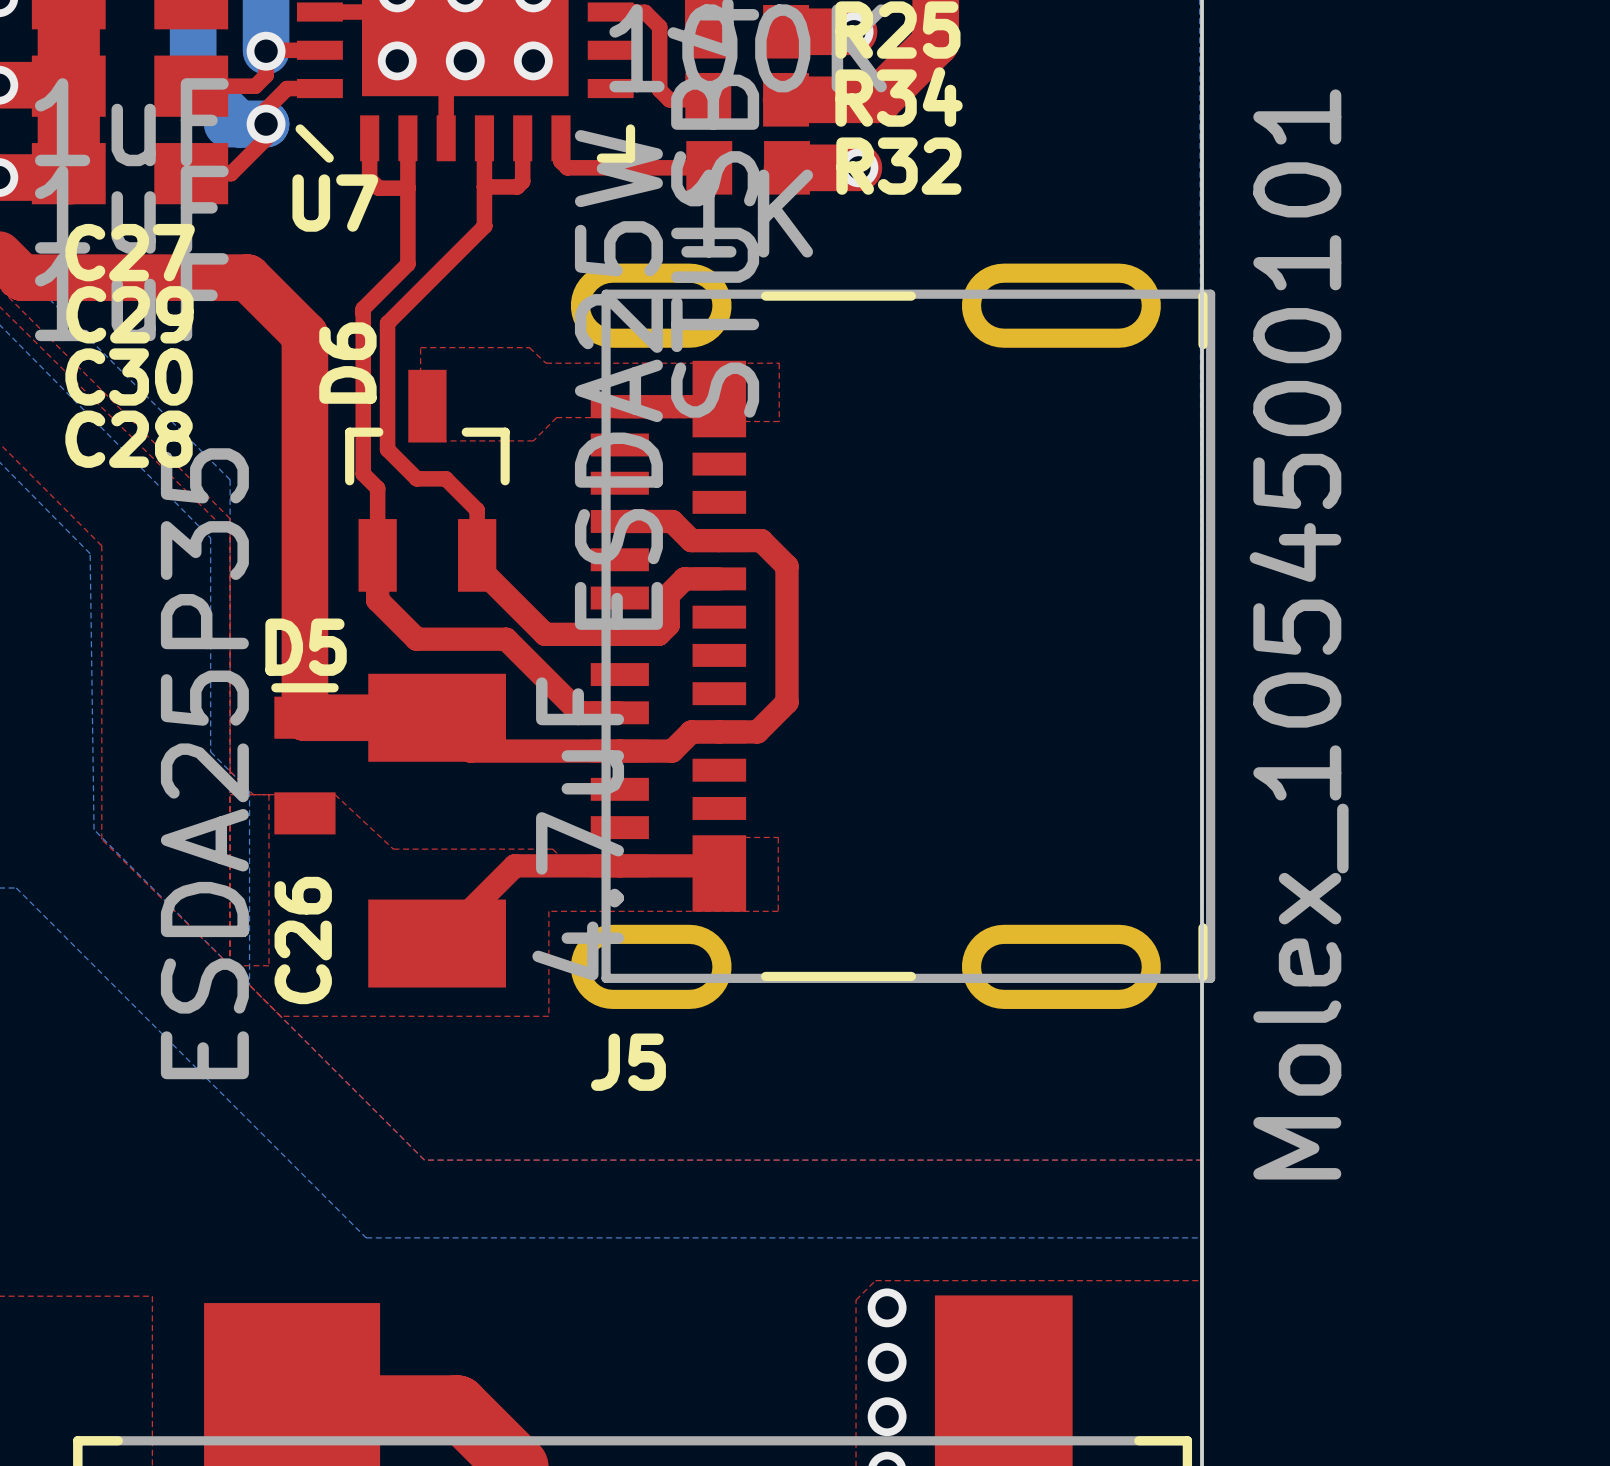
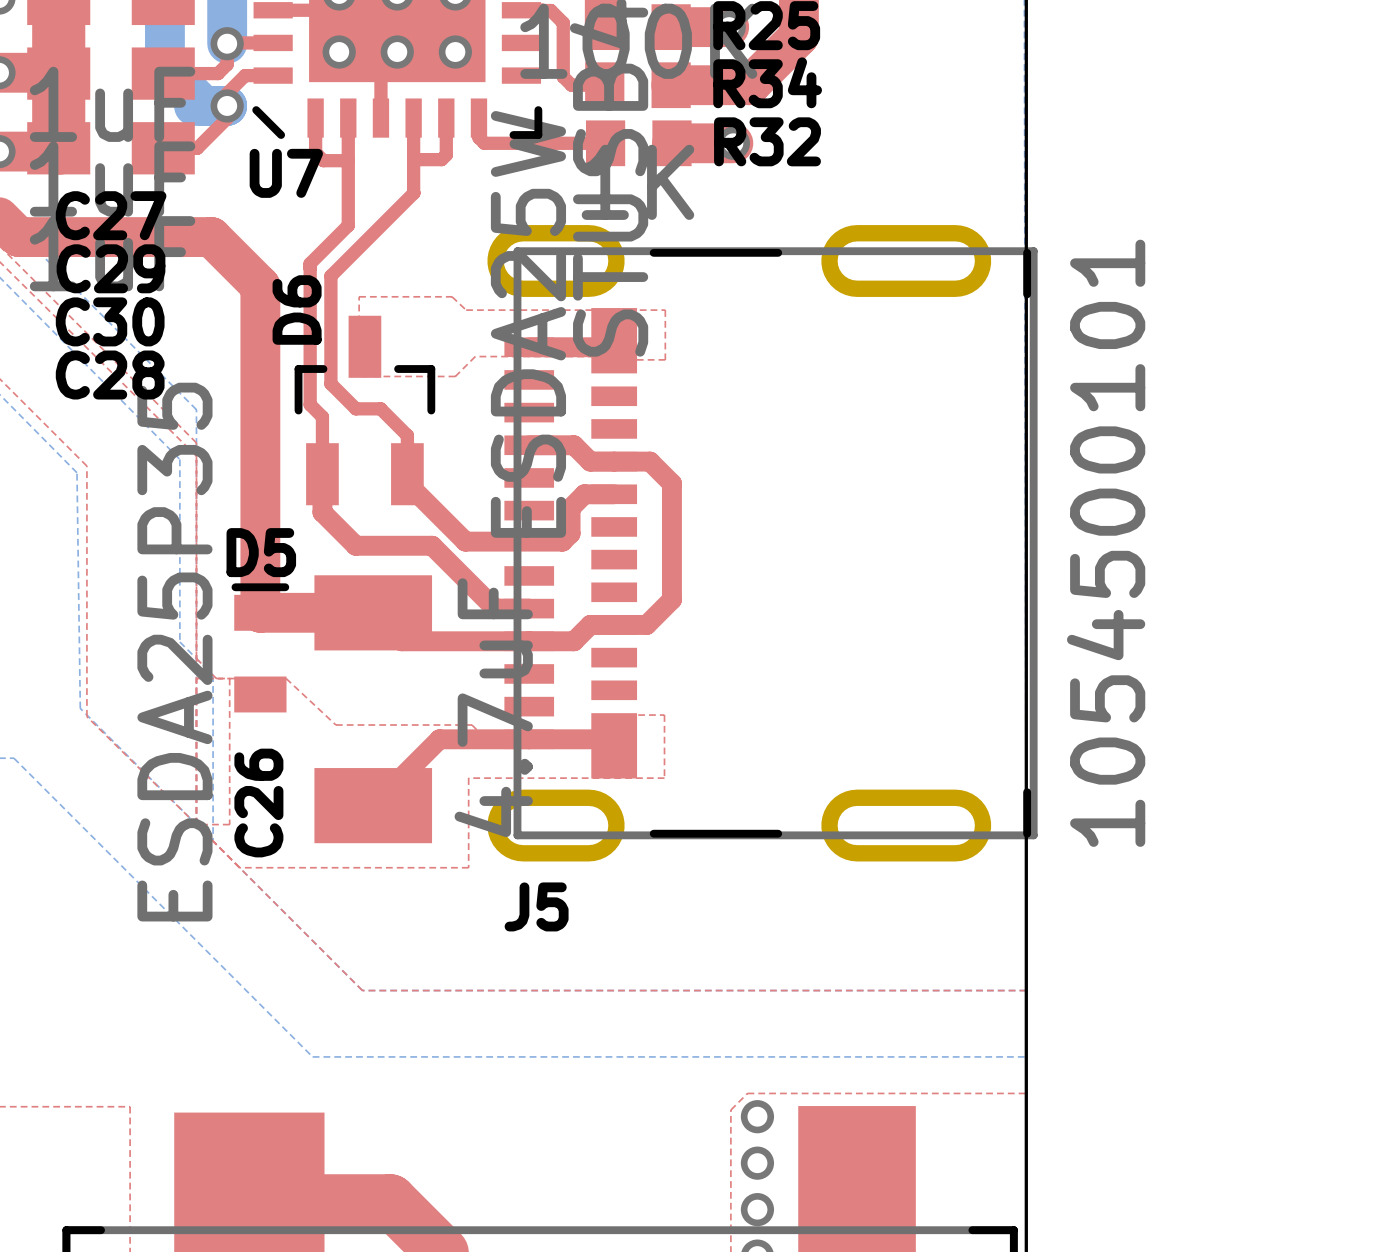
J5 value: Molex_1054500101 (1299, 634) -> 1054500101 (1106, 543)

